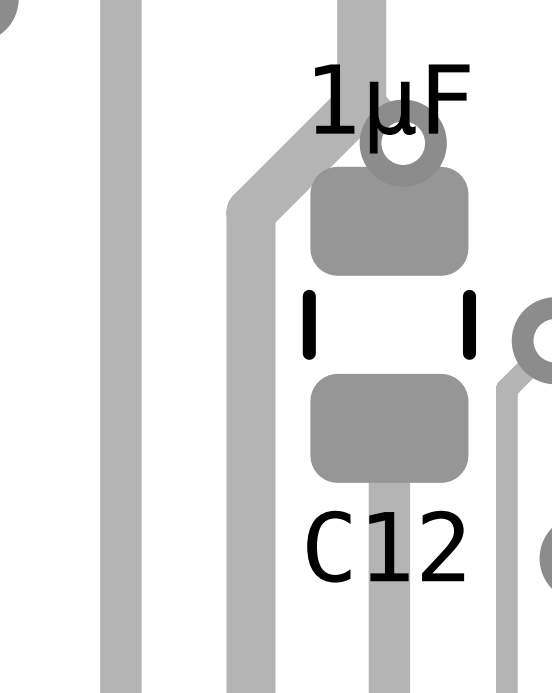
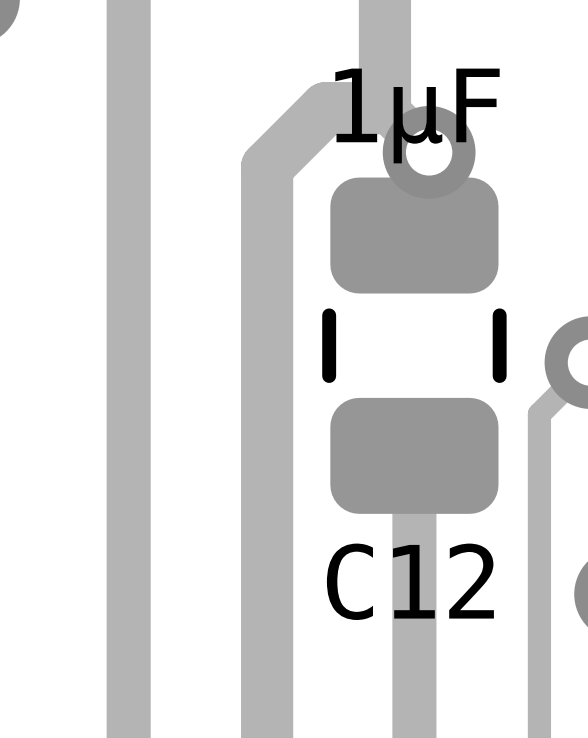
track: (361, 101) (251, 212) -> (384, 108) (326, 108) (267, 167) (267, 226)

